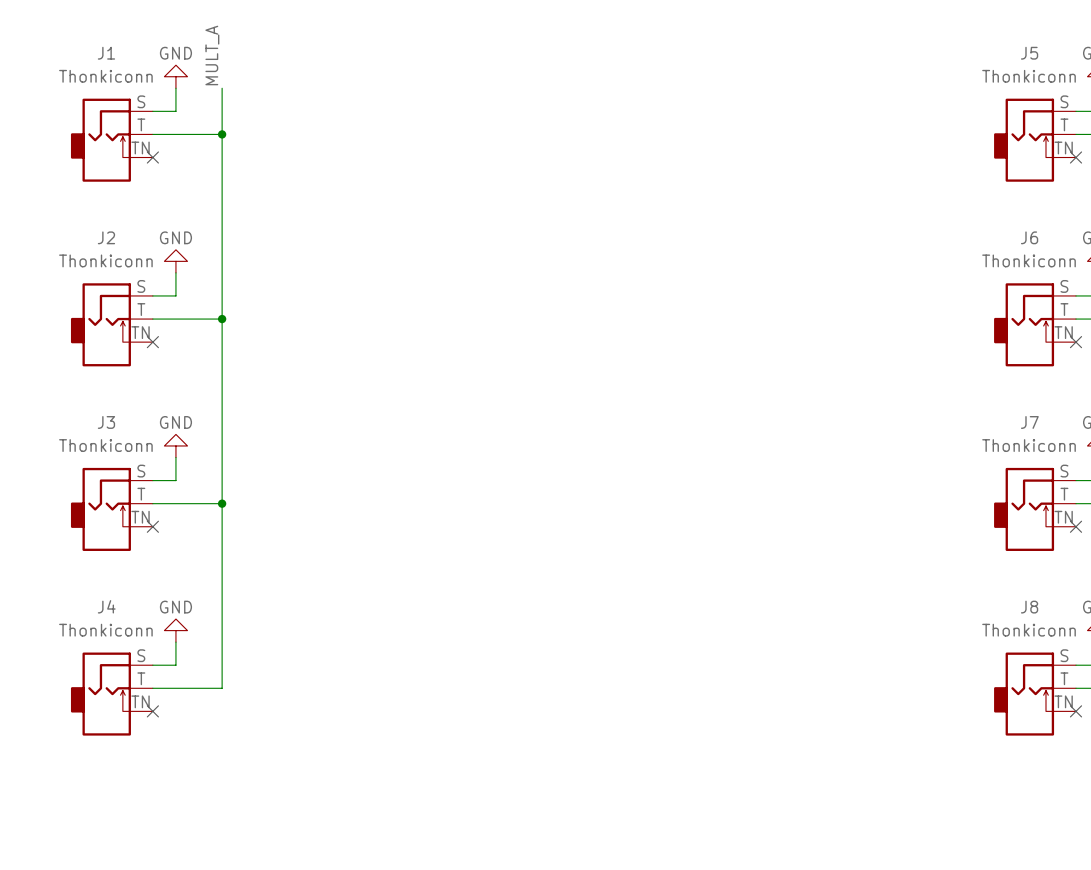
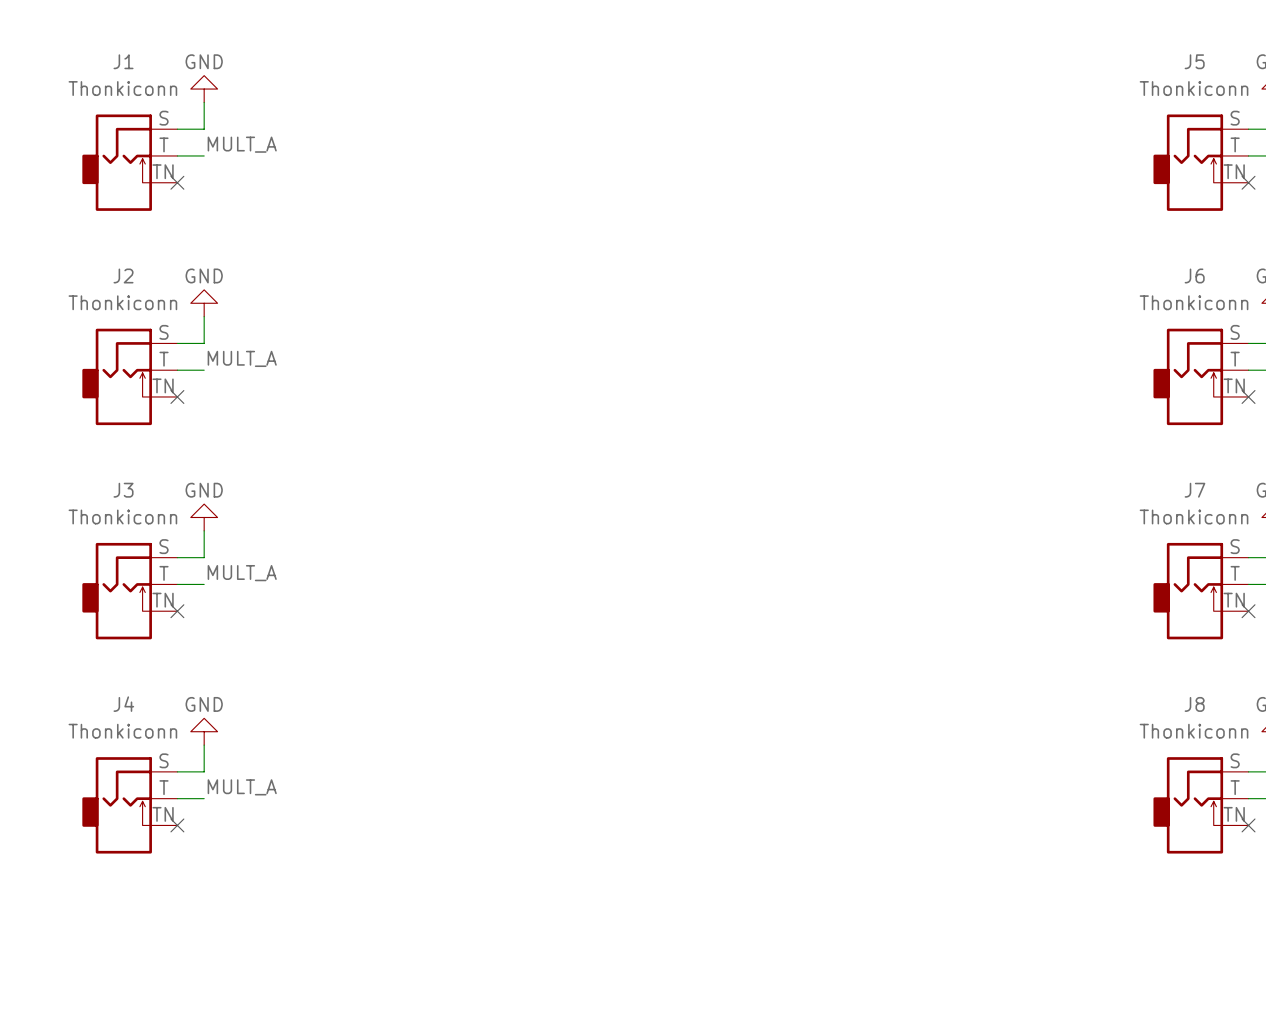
label rotation: 0° (212, 55) -> 90° clockwise (242, 144)
wire: (222, 88) (222, 688) (175, 688) -> none
wire: (175, 134) (222, 134) -> none
junction: (222, 134) -> none
label: none -> MULT_A (242, 358)
wire: (175, 319) (222, 319) -> none
junction: (222, 319) -> none
label: none -> MULT_A (242, 573)
wire: (175, 503) (222, 503) -> none
junction: (222, 503) -> none
label: none -> MULT_A (242, 787)

